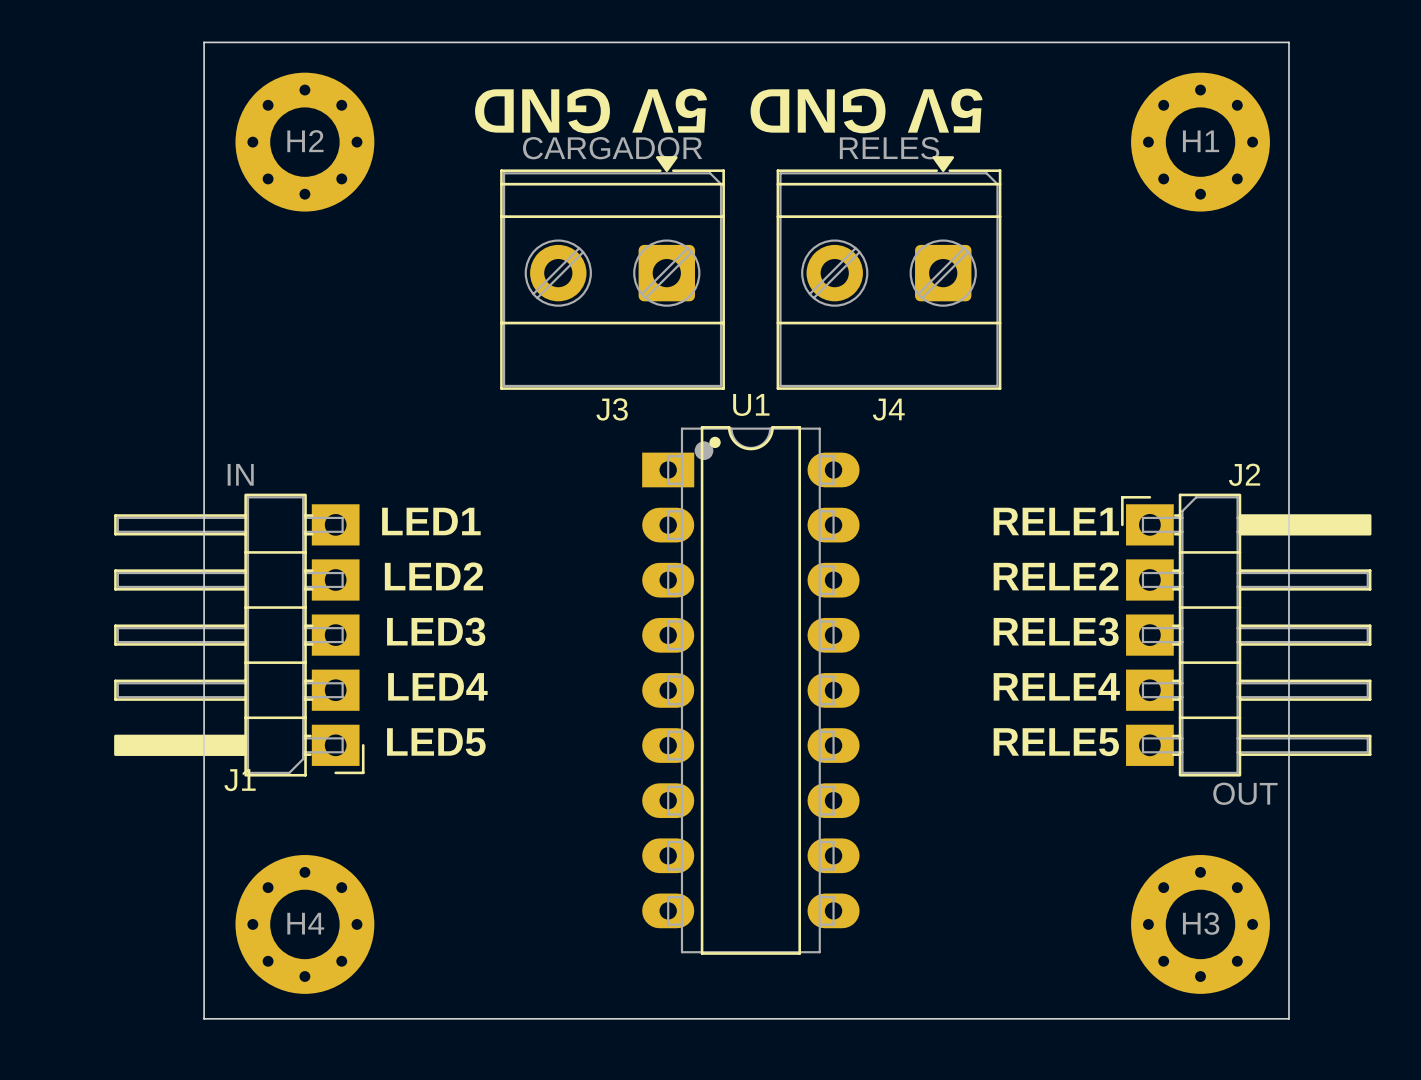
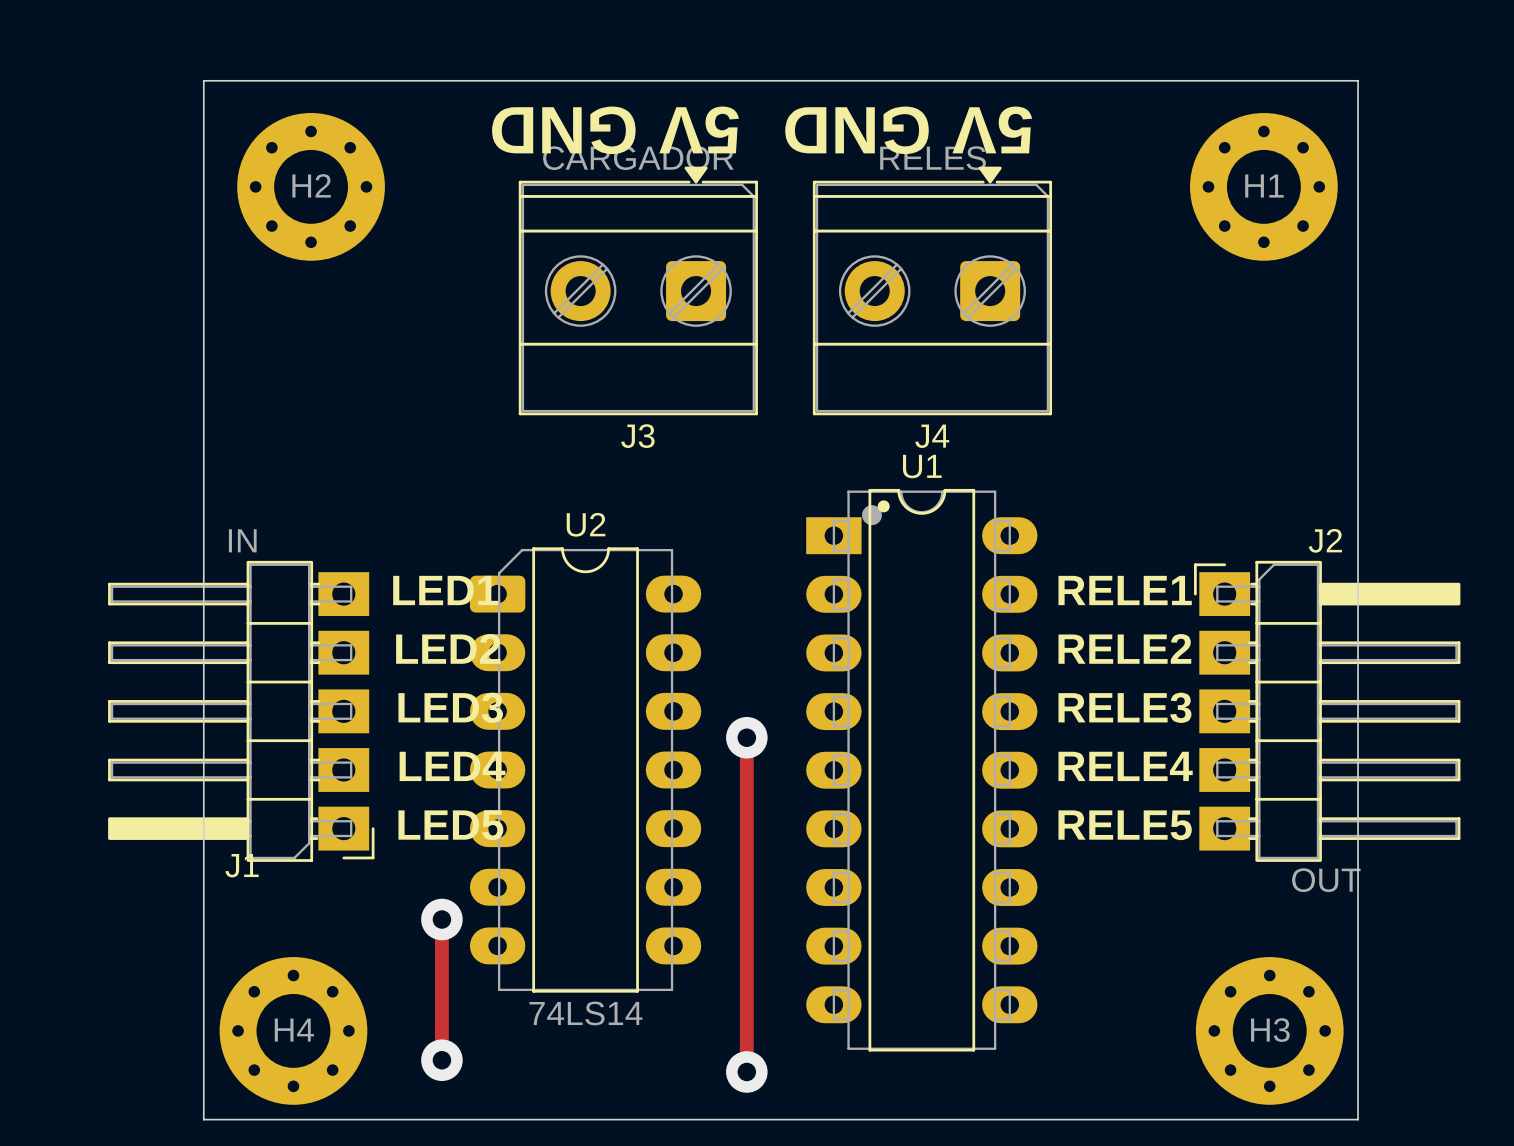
text position: GND (542, 110) -> GND (563, 130)
text position: 5V (669, 110) -> 5V (699, 129)
text position: GND (818, 110) -> GND (856, 130)
text position: 5V (945, 110) -> 5V (992, 129)
J3 position: (612, 273) -> (638, 290)
J4 position: (888, 273) -> (932, 290)
text position: RELE1 (1056, 521) -> RELE1 (1125, 590)
text position: RELE2 (1056, 576) -> RELE2 (1124, 648)
text position: RELE3 (1056, 631) -> RELE3 (1124, 707)
J2 position: (1246, 635) -> (1327, 711)
track: none -> (746, 737) (746, 1071)
via: none -> (746, 737)
text position: RELE4 (1056, 686) -> RELE4 (1125, 766)
U2: none -> 74LS14 (585, 770)
U1 position: (750, 690) -> (921, 770)
text position: RELE5 (1056, 742) -> RELE5 (1125, 825)
track: none -> (441, 919) (441, 1060)
via: none -> (441, 919)
H4 position: (304, 924) -> (293, 1030)
H3 position: (1200, 924) -> (1269, 1030)
via: none -> (441, 1060)
via: none -> (746, 1071)

